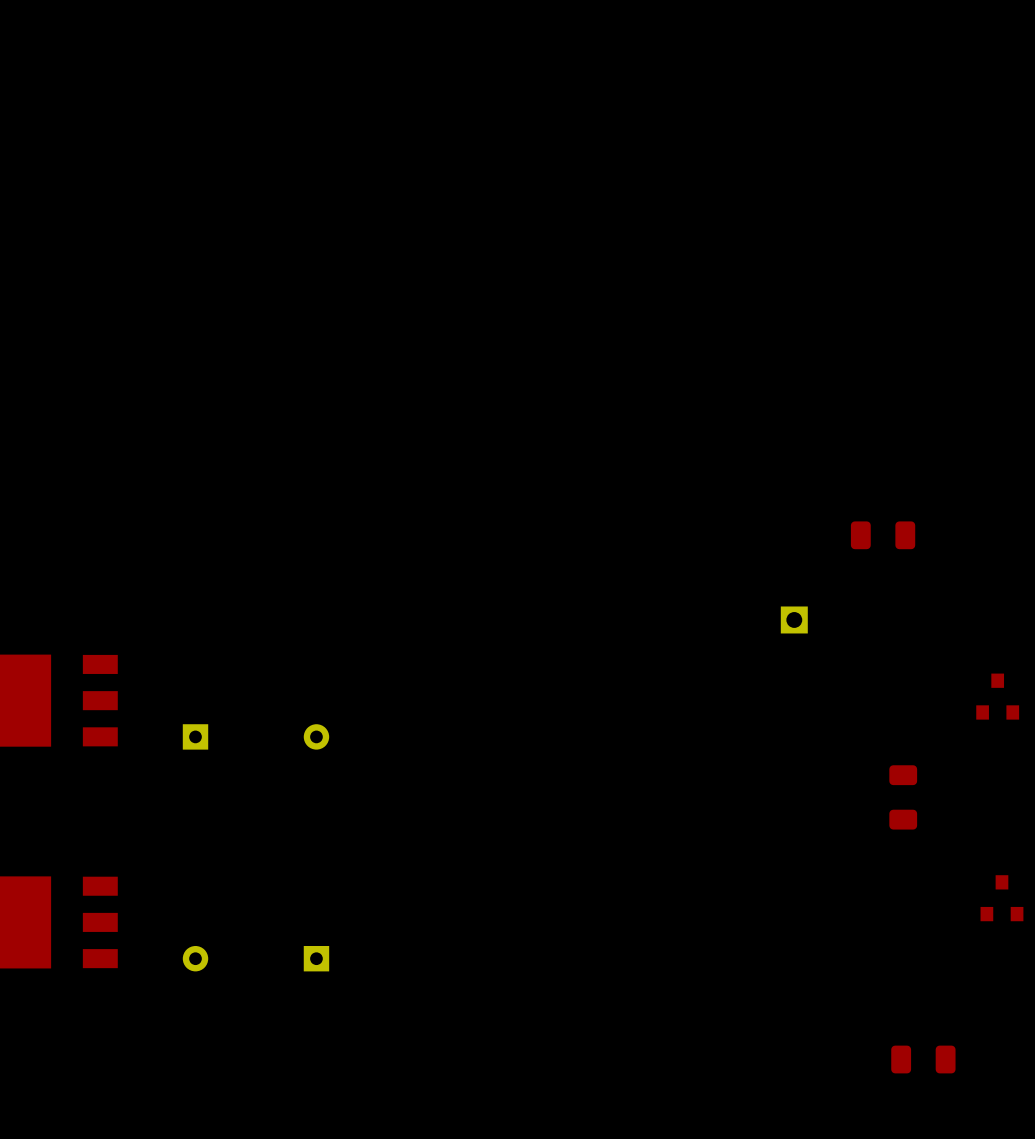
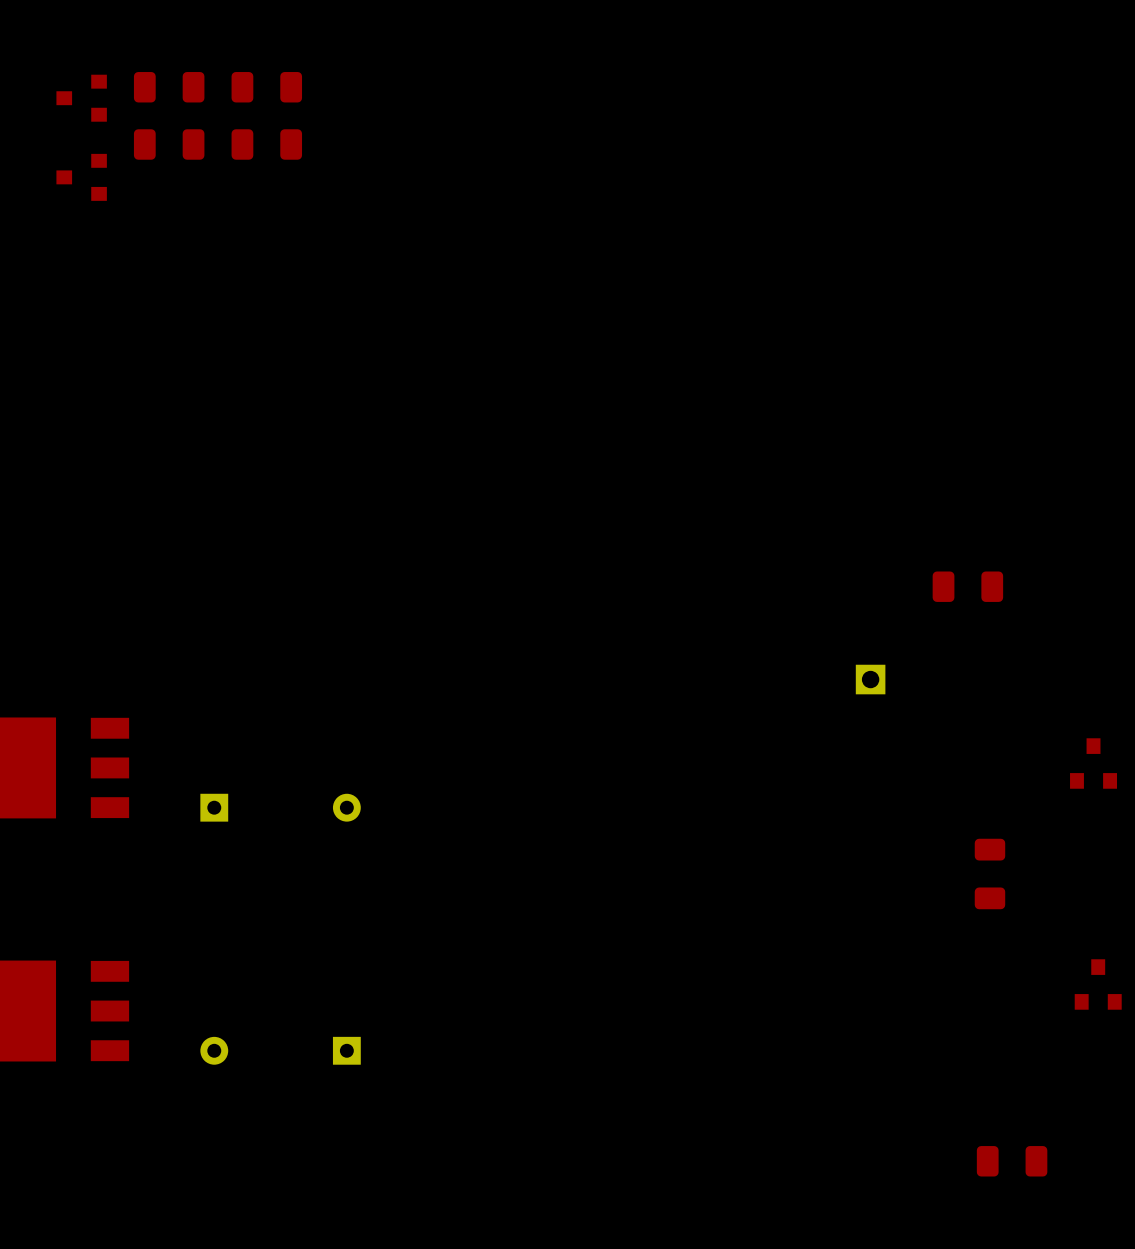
part: none -> (169, 87)
part: none -> (266, 87)
part: none -> (81, 98)
part: none -> (169, 144)
part: none -> (266, 144)
part: none -> (81, 177)

